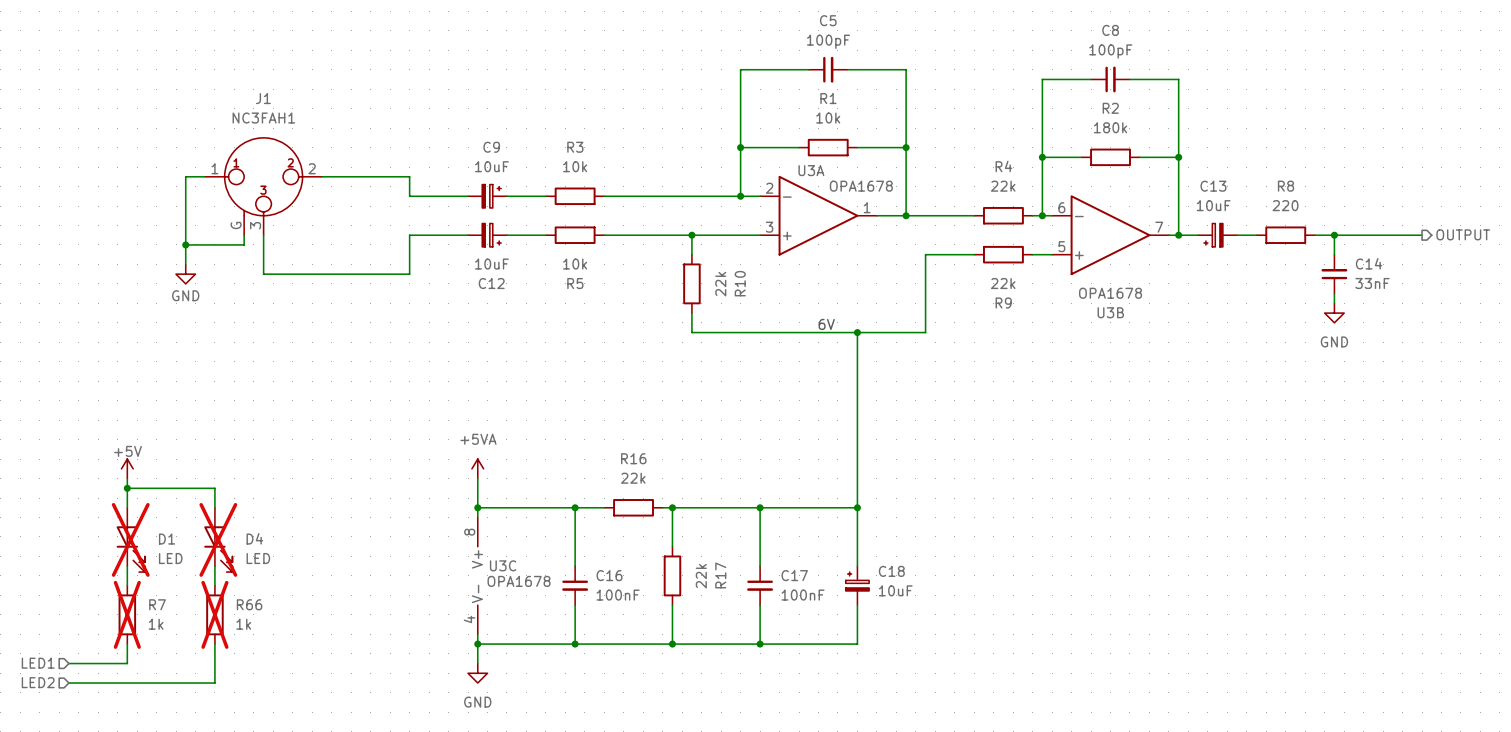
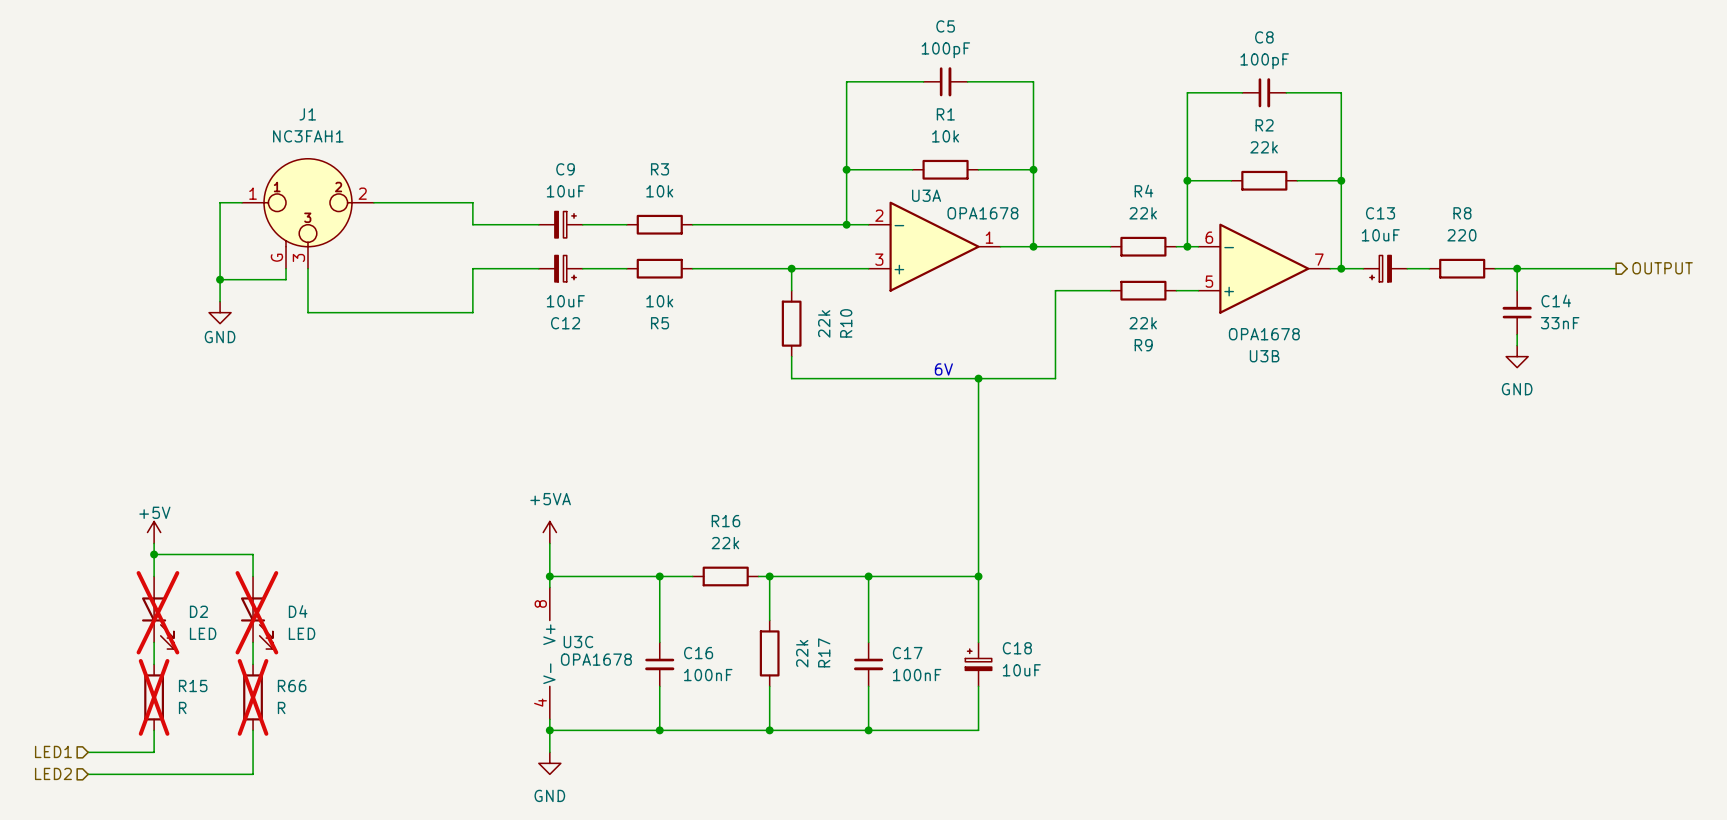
R2 value: 180k (1110, 127) -> 22k (1264, 147)
D1 name: D1 (167, 539) -> D2 (198, 611)
R7 name: R7 (157, 604) -> R15 (193, 685)
R7 value: 1k (156, 624) -> R (182, 707)
R66 value: 1k (243, 624) -> R (281, 707)

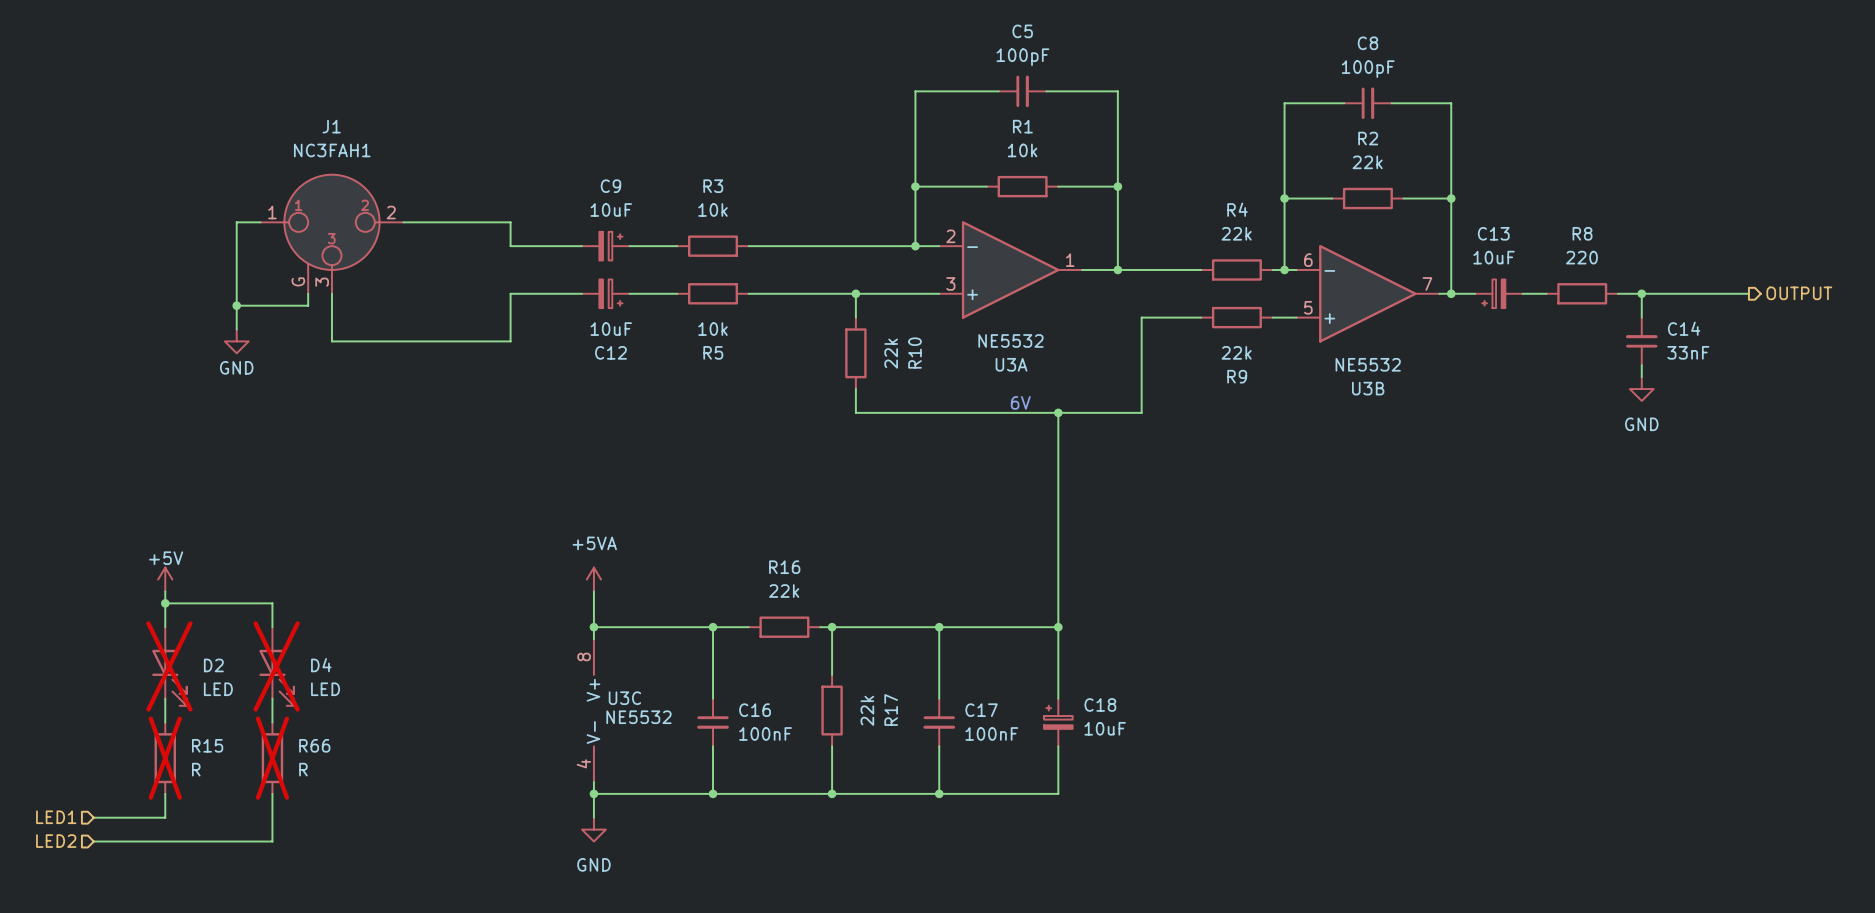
U3A name position: U3A (926, 195) -> U3A (1011, 364)
U3A value: OPA1678 (982, 213) -> NE5532 (1010, 340)
U3B value: OPA1678 (1264, 334) -> NE5532 (1368, 364)
U3C value: OPA1678 (596, 659) -> NE5532 (638, 717)

